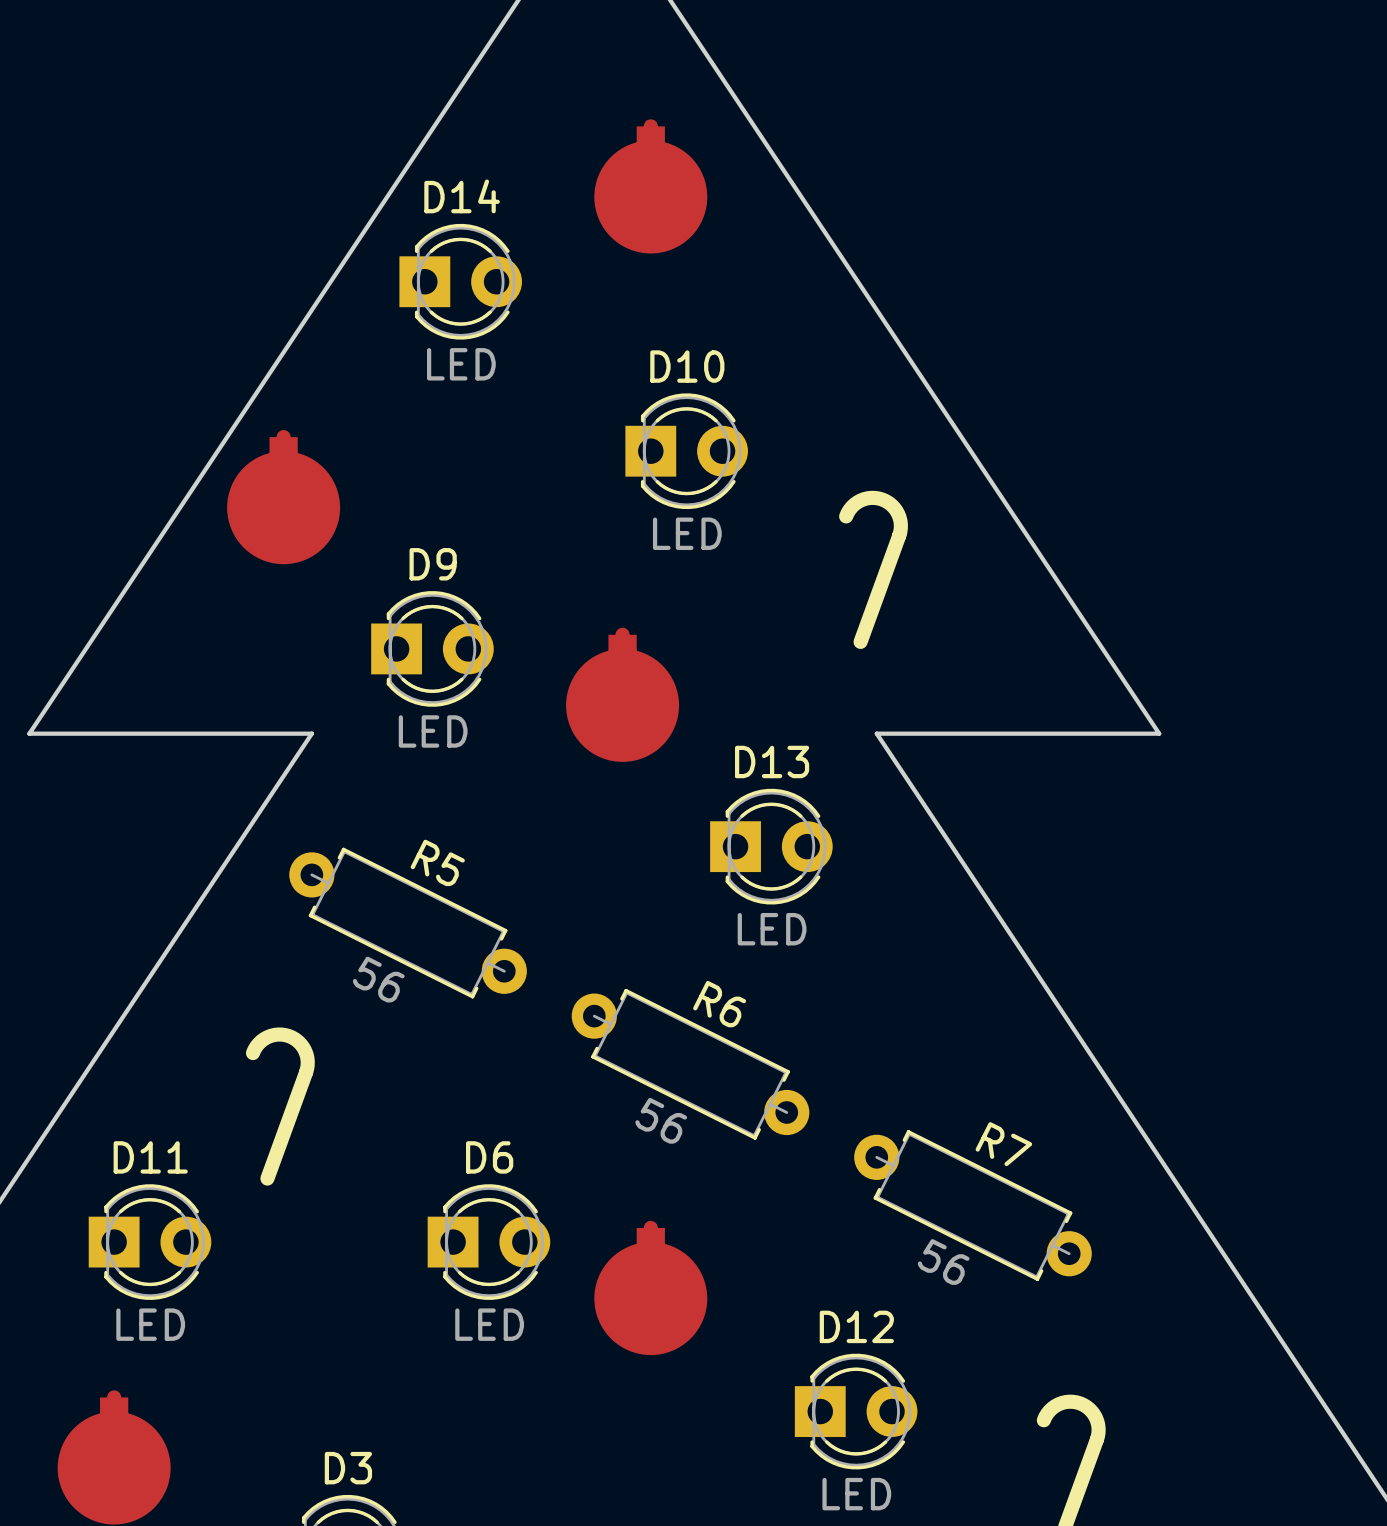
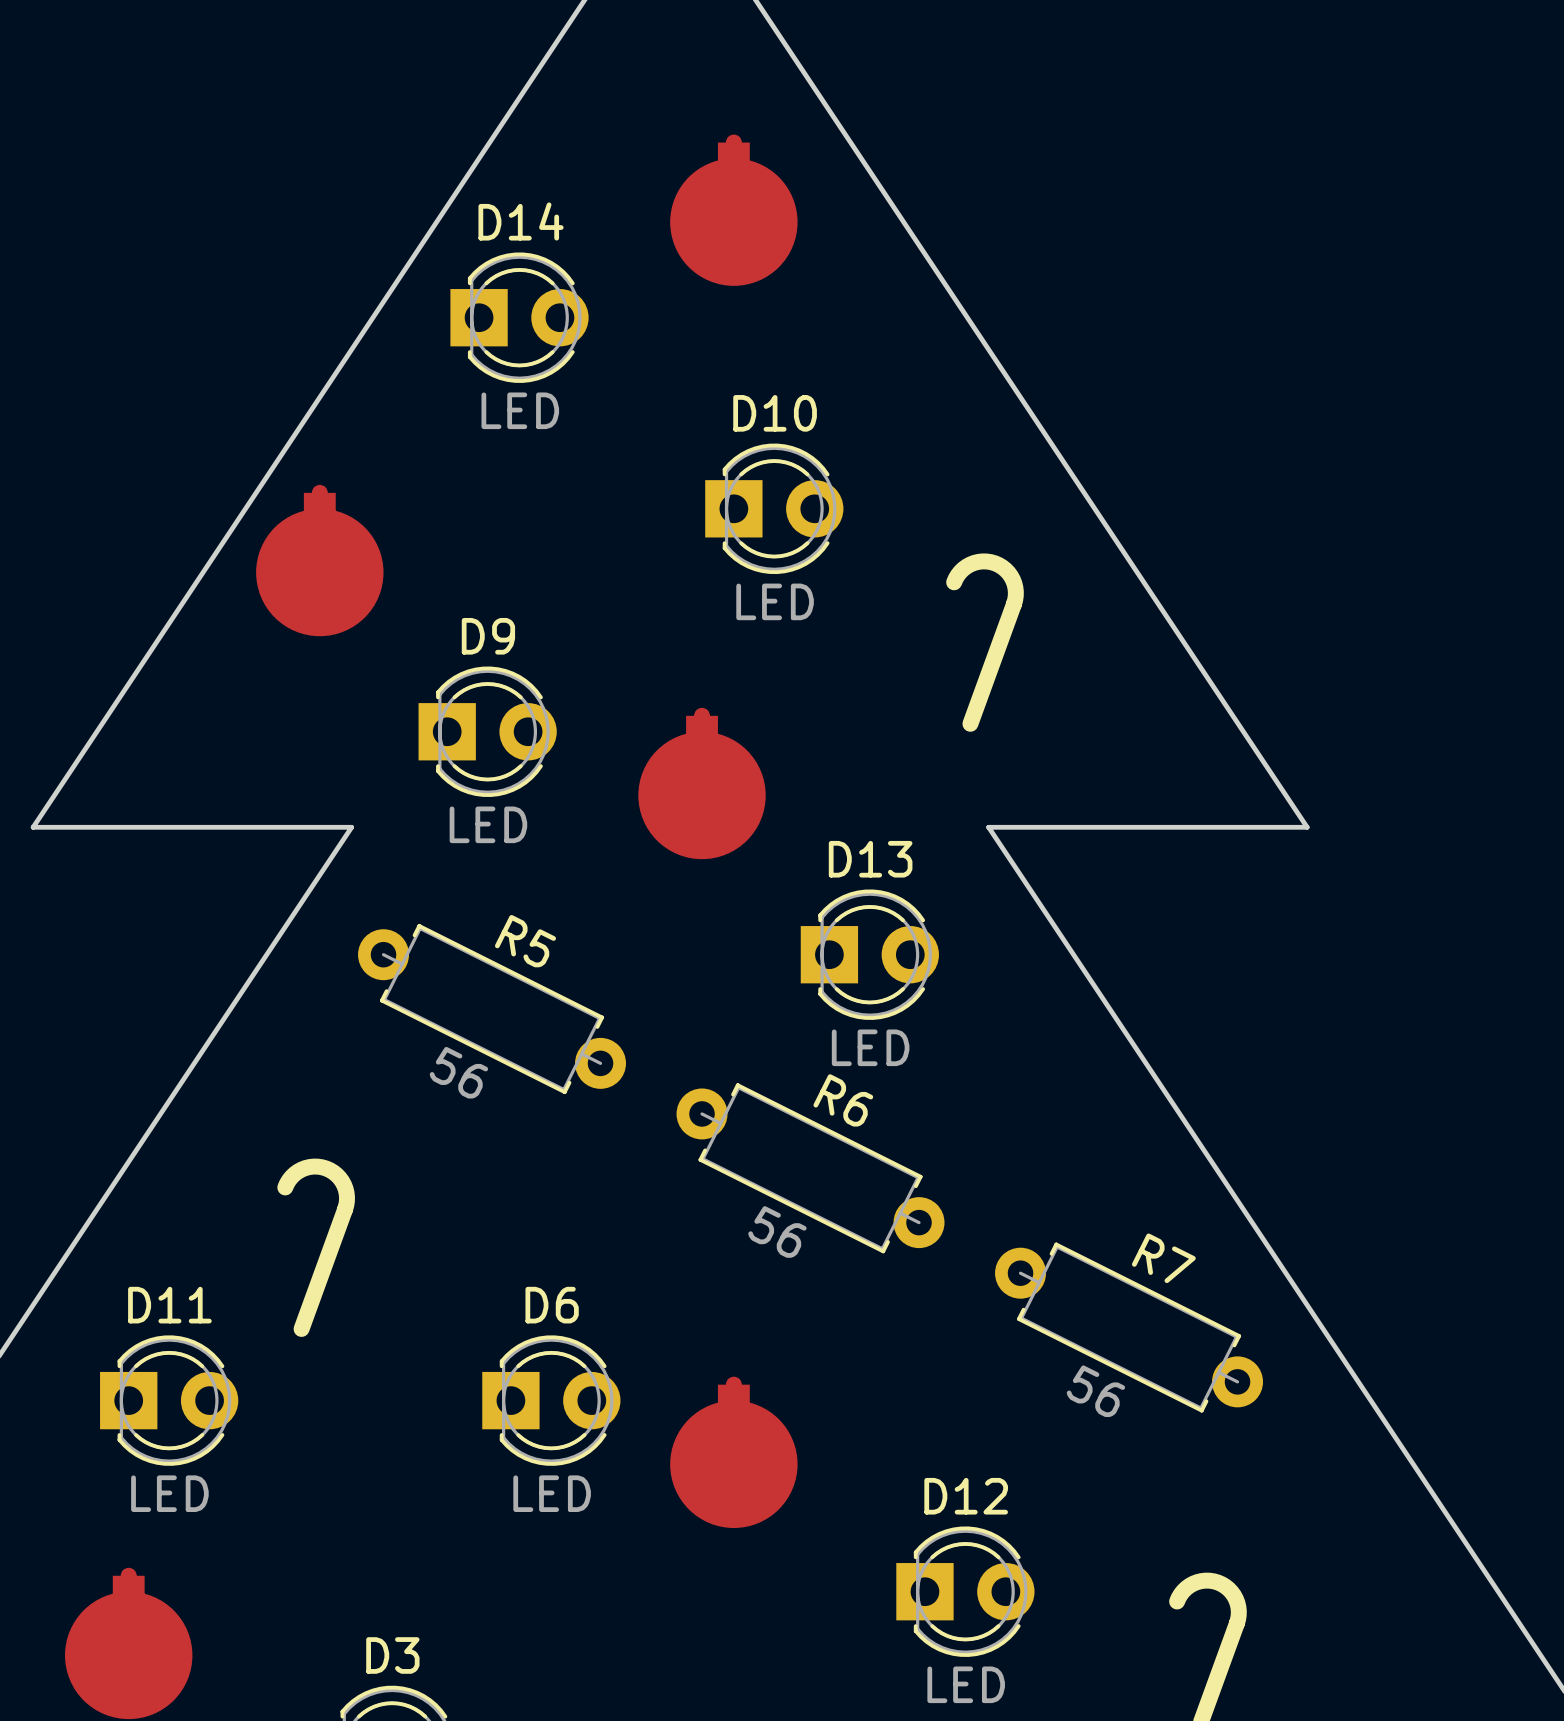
R5 position: (408, 923) -> (492, 1009)
R6 position: (690, 1064) -> (810, 1168)
R7 position: (972, 1205) -> (1129, 1327)

